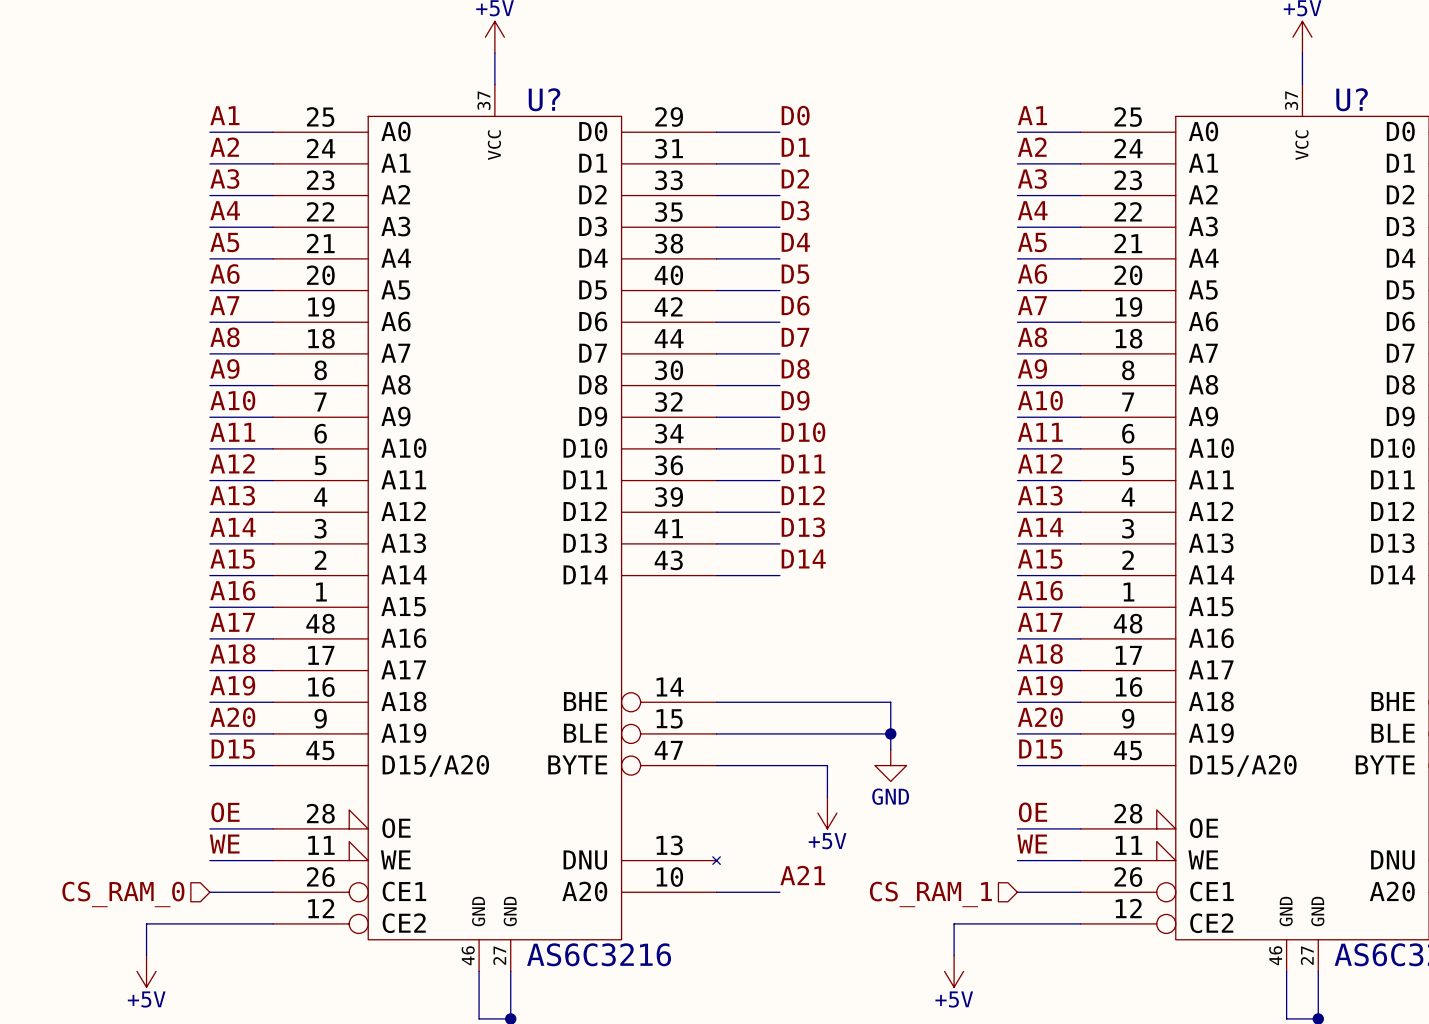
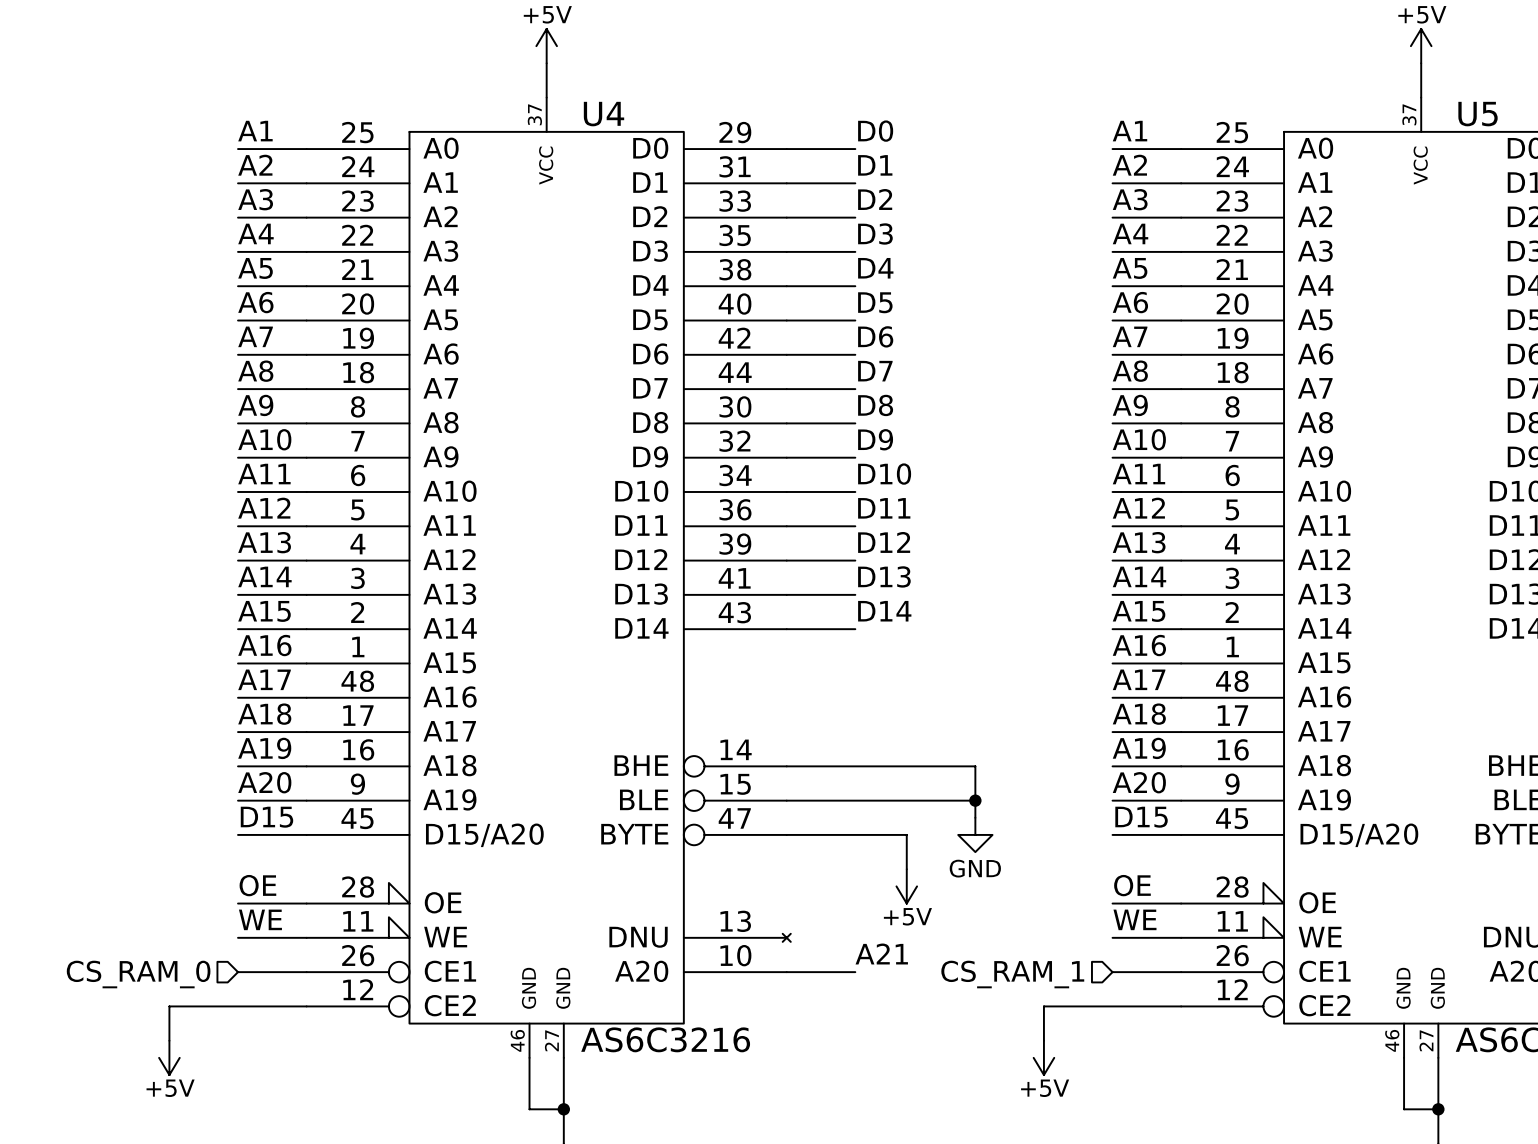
U? name: U? (544, 99) -> U4 (604, 114)
U? name: U? (1352, 99) -> U5 (1478, 114)

